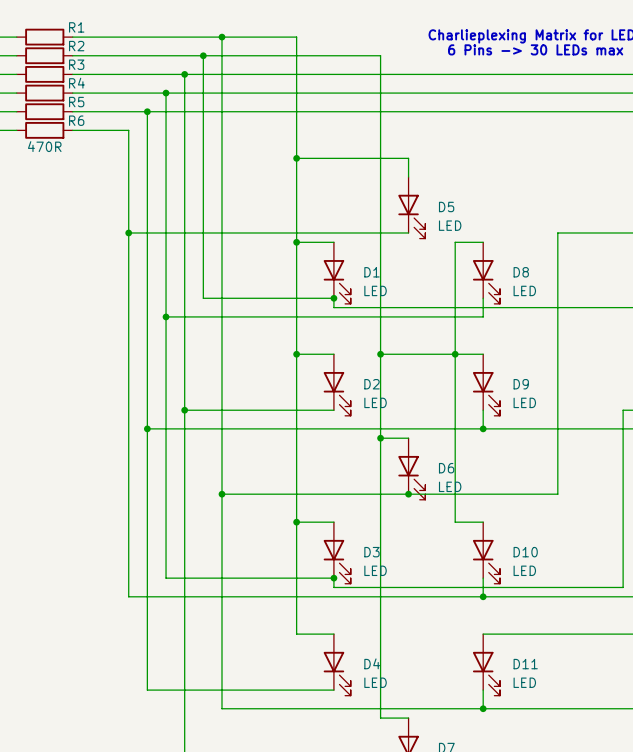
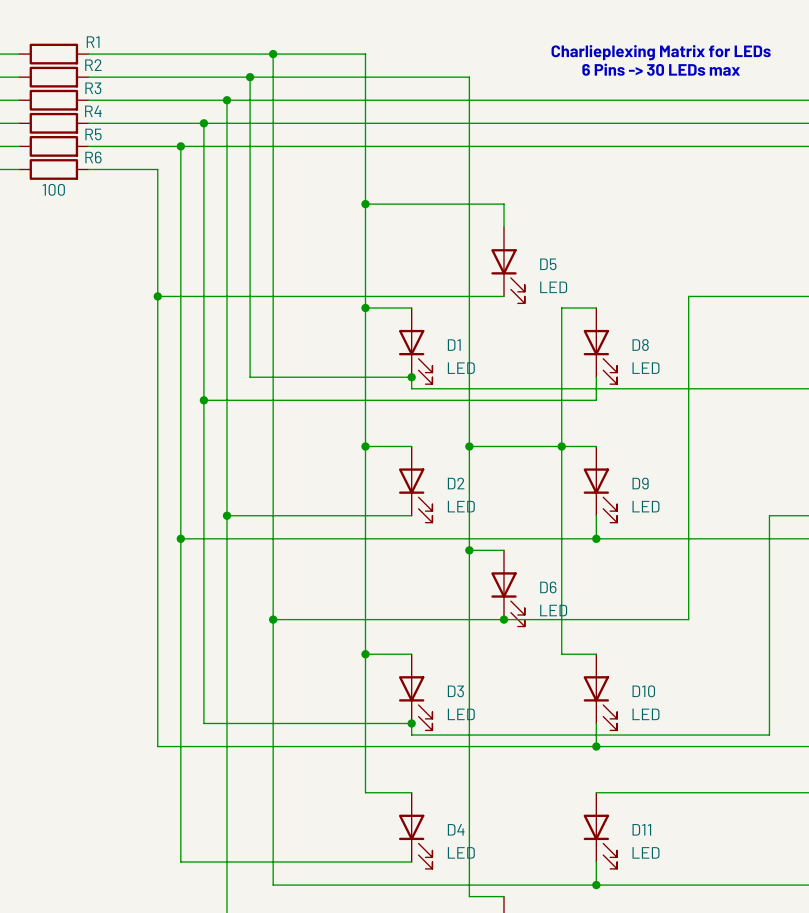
R1 value: 470R (44, 146) -> 100 (53, 189)

